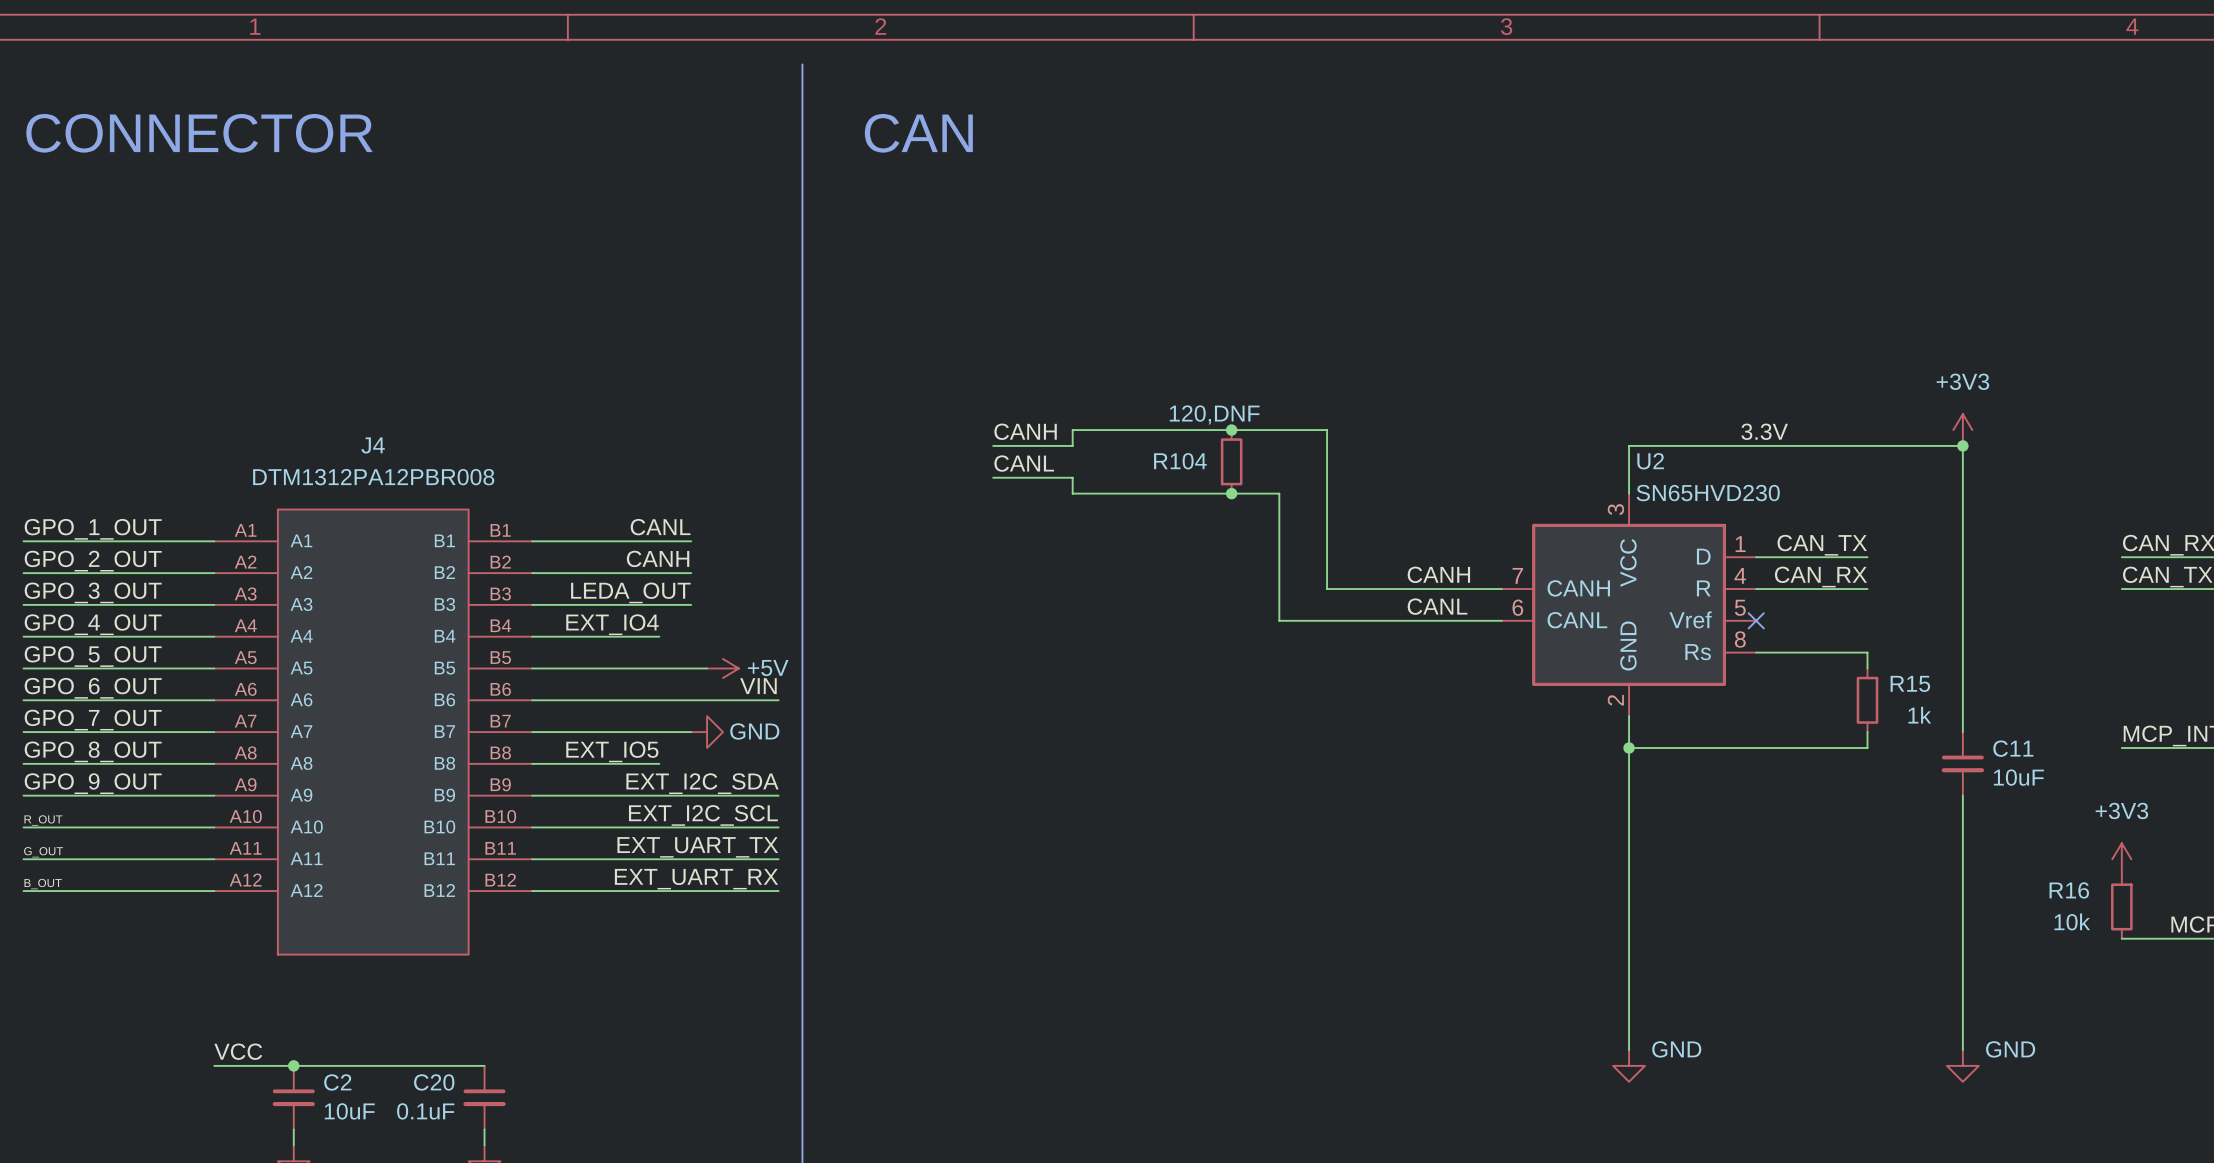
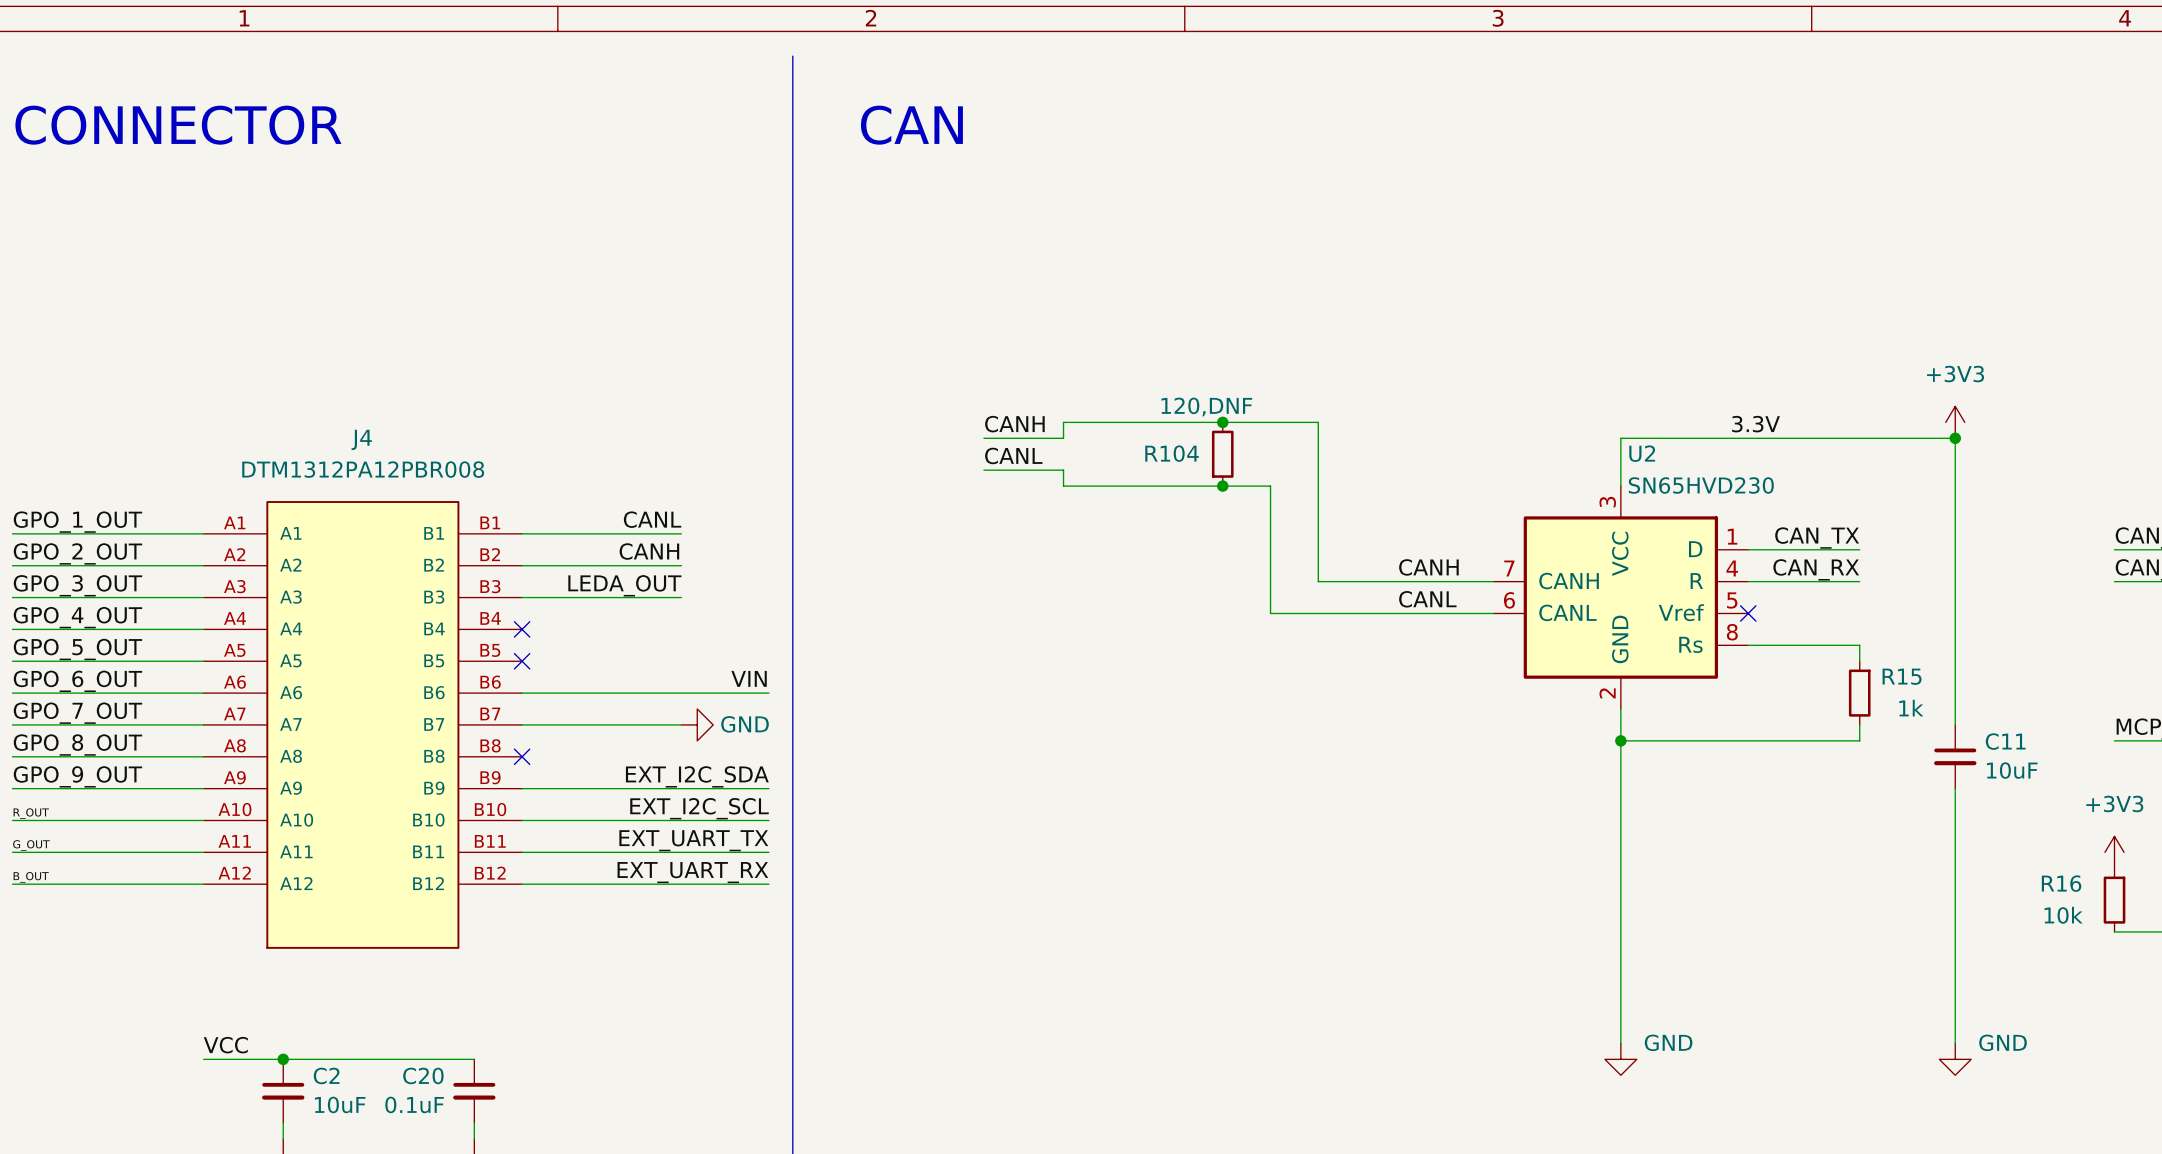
label: EXT_IO4 (612, 624) -> none
wire: (532, 636) (659, 636) -> none
no-connect mark: none -> (522, 629)
wire: (532, 668) (707, 668) -> none
no-connect mark: none -> (522, 661)
power symbol: +5V (722, 668) -> none
label: EXT_IO5 (612, 751) -> none
wire: (532, 763) (659, 763) -> none
no-connect mark: none -> (522, 756)

